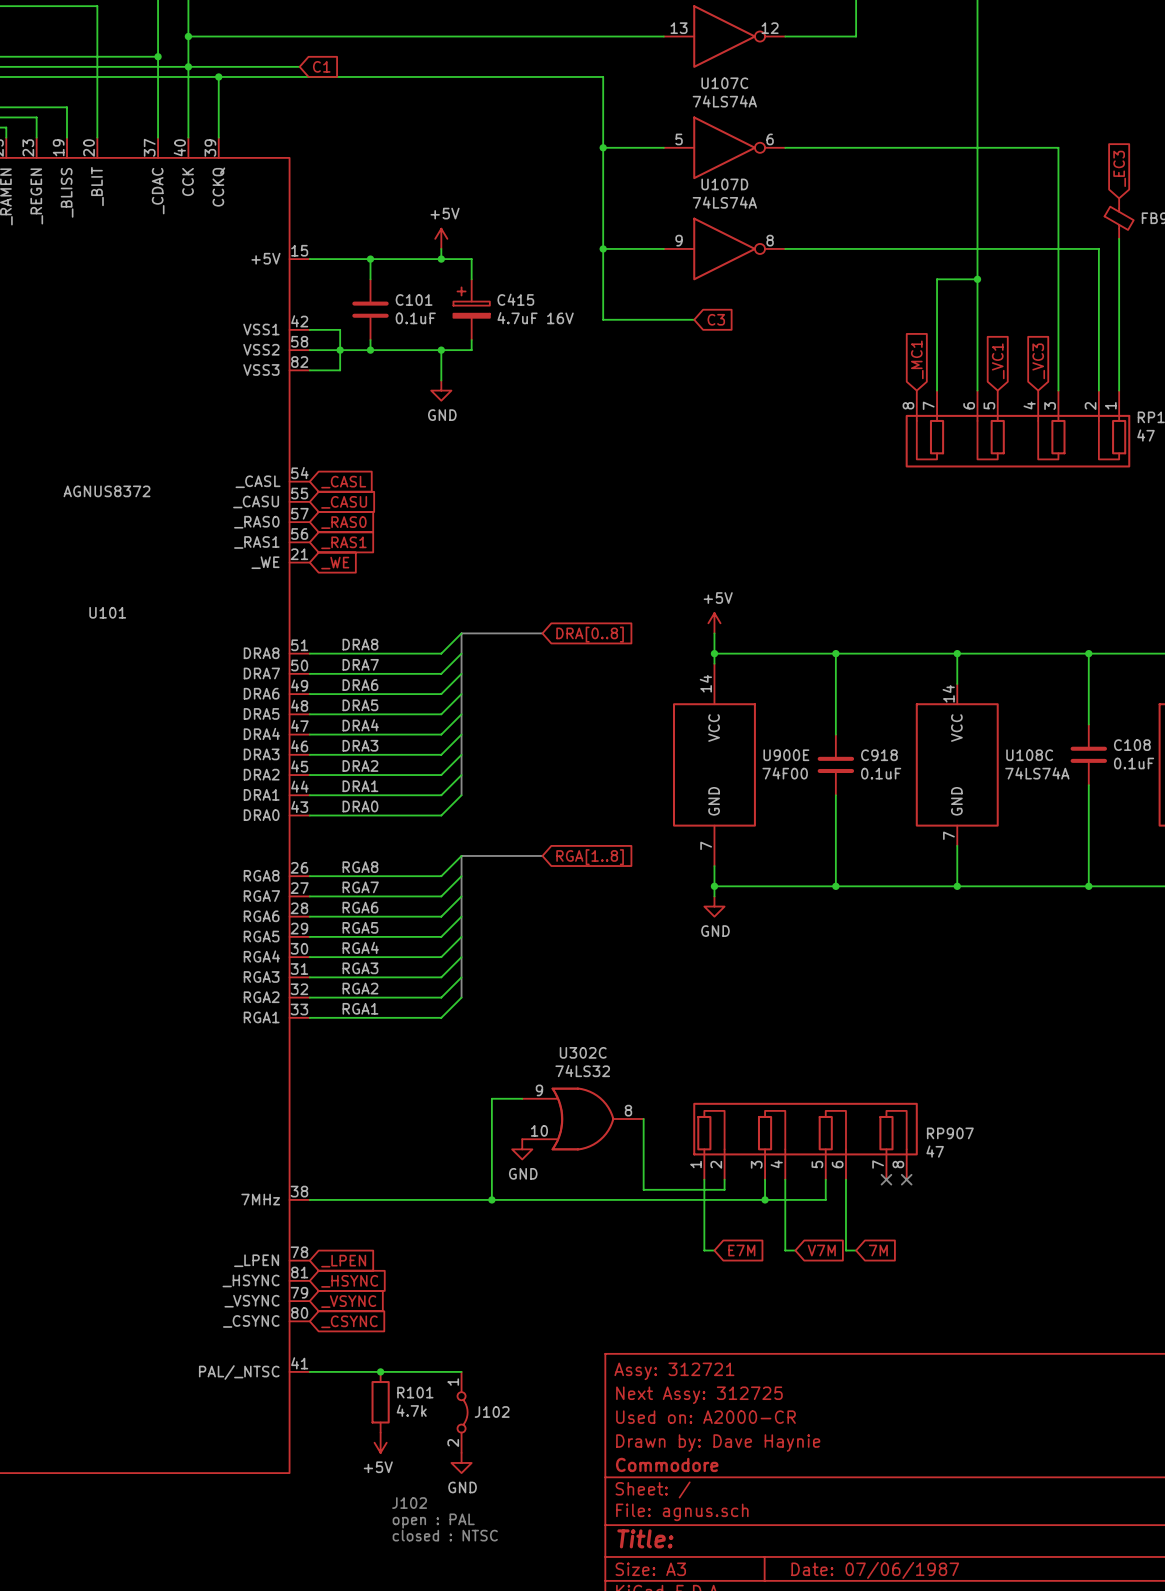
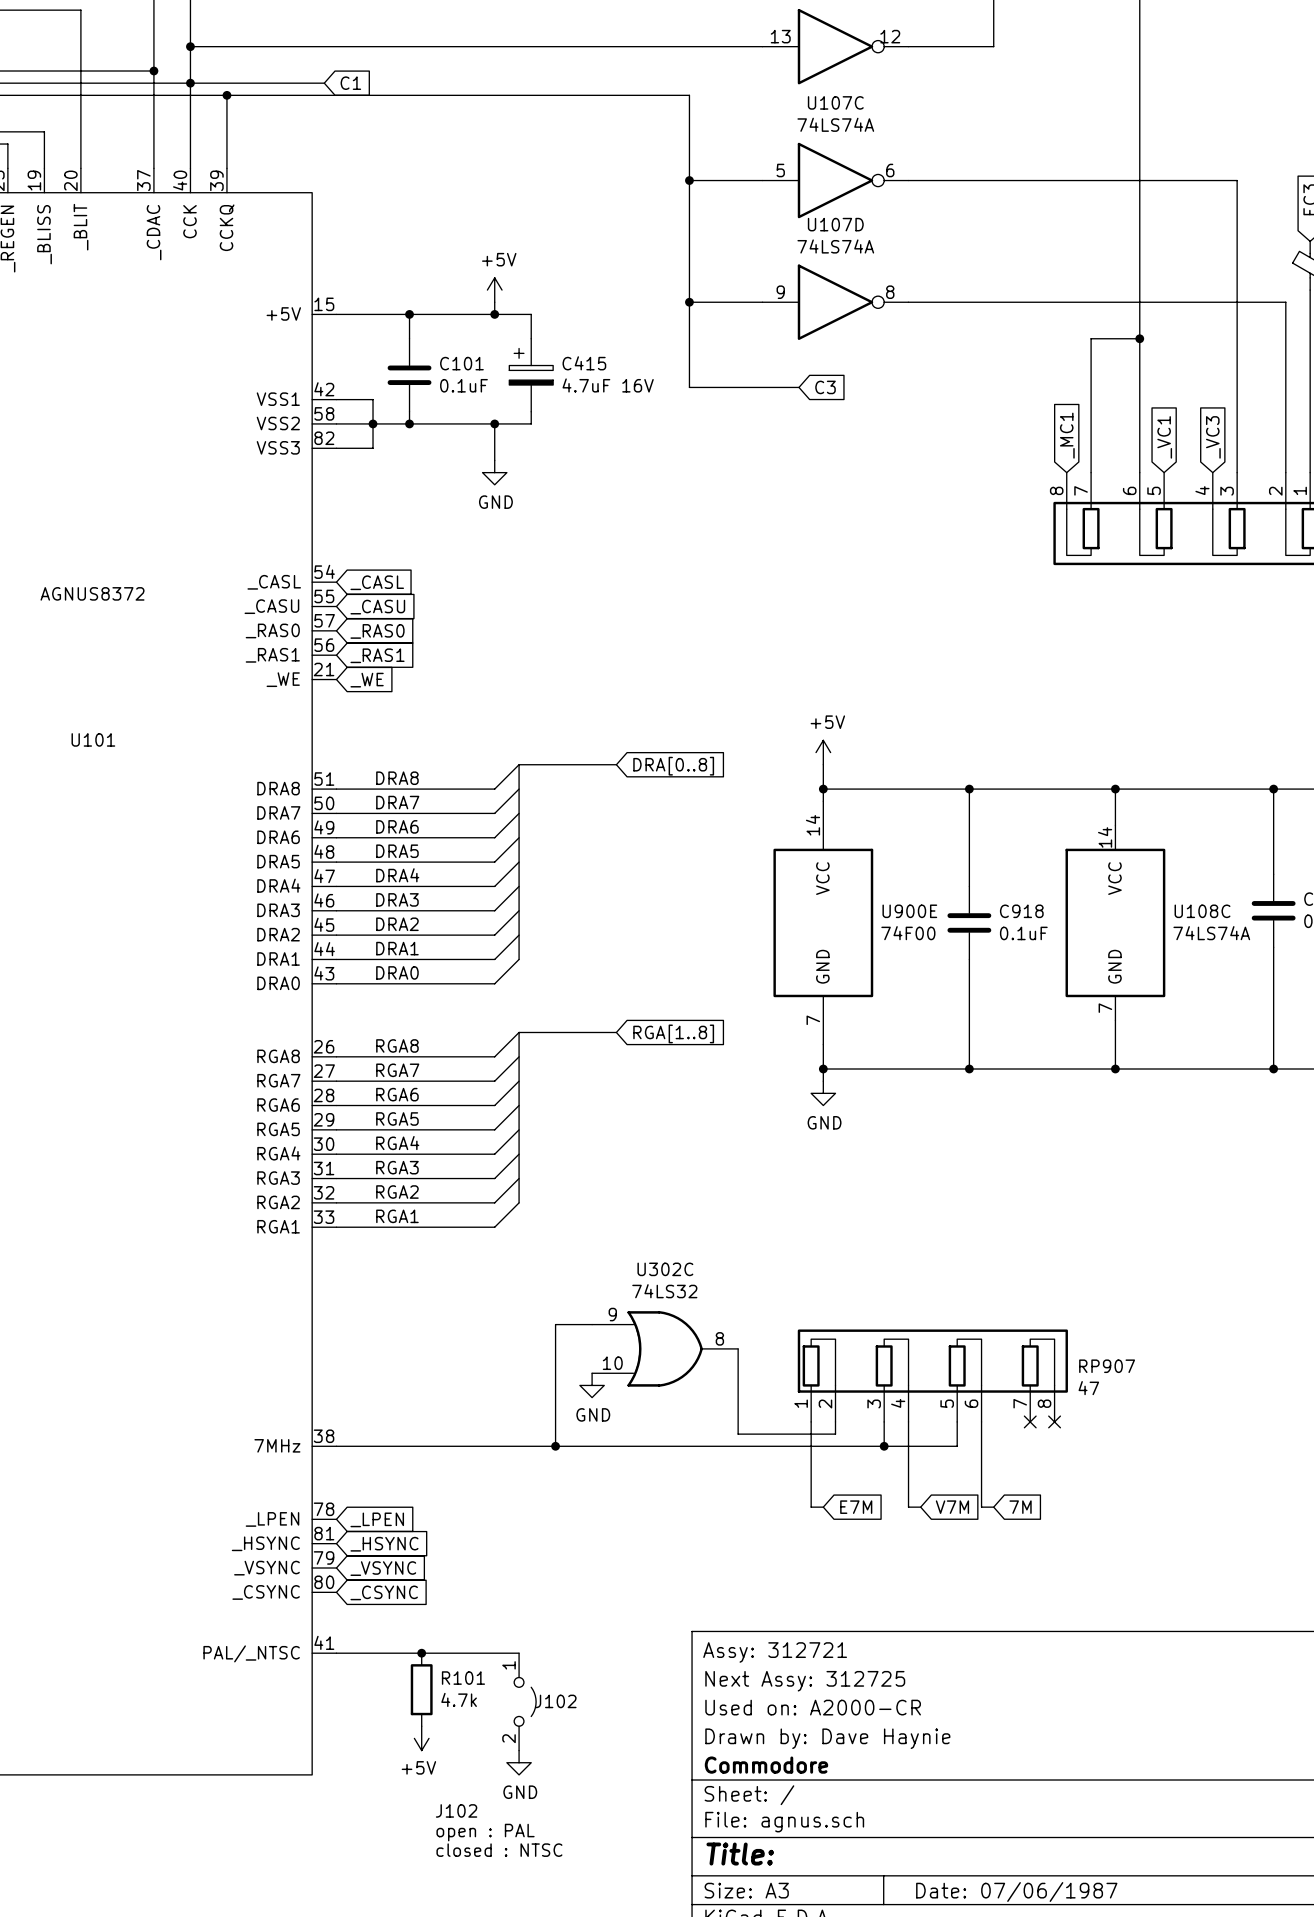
J102 symbol: [457, 1371, 468, 1453] -> [514, 1653, 537, 1751]

